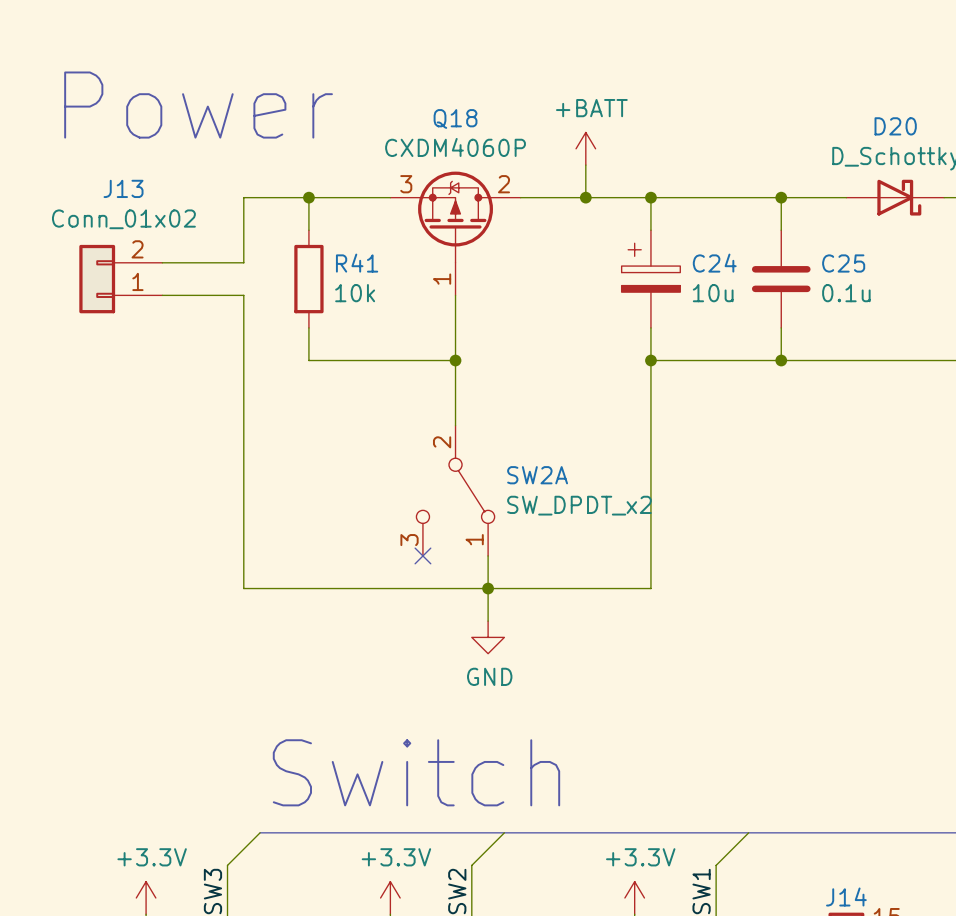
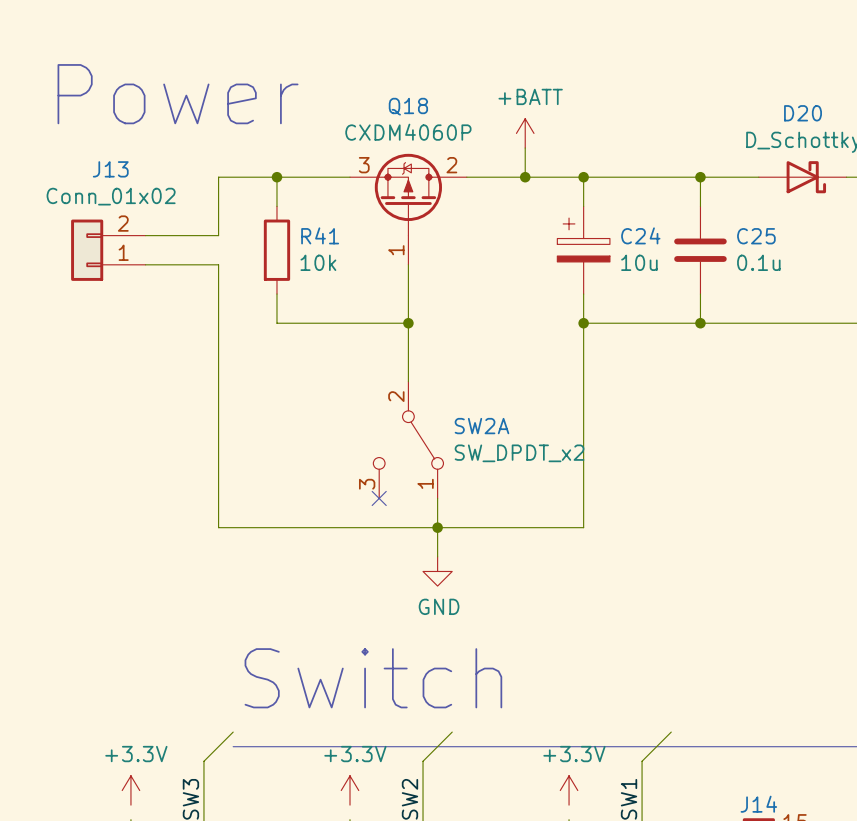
text position: Switch (416, 772) -> Switch (373, 678)
wire: (260, 832) (227, 865) -> (233, 732) (203, 761) (203, 775)
wire: (504, 832) (471, 865) -> (452, 732) (423, 761) (423, 775)
wire: (748, 832) (716, 865) -> (671, 732) (642, 761) (642, 775)
power symbol position: +3.3V (146, 897) -> +3.3V (130, 790)
power symbol position: +3.3V (390, 897) -> +3.3V (350, 790)
power symbol position: +3.3V (634, 897) -> +3.3V (569, 790)

